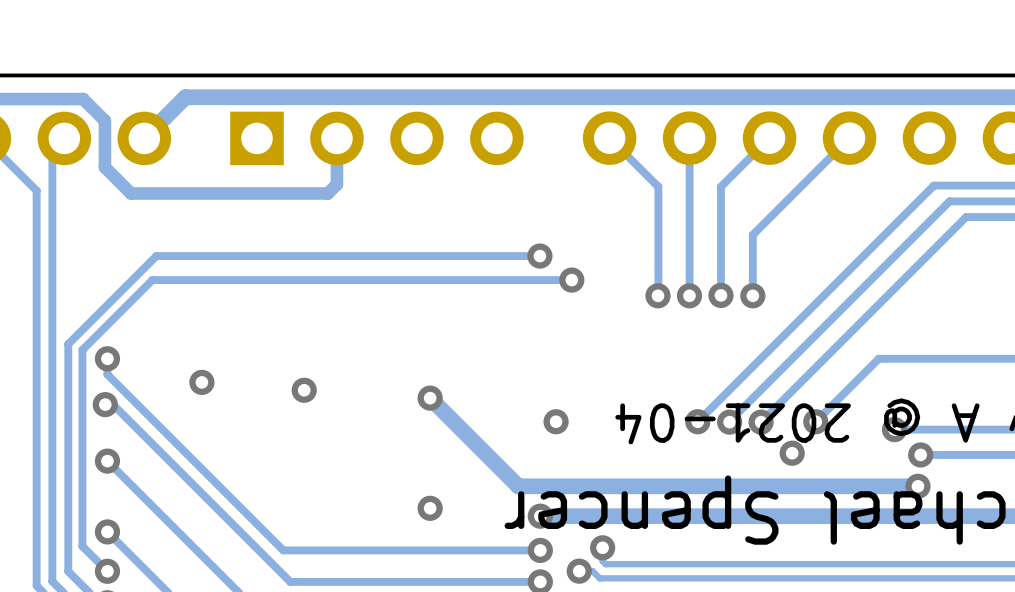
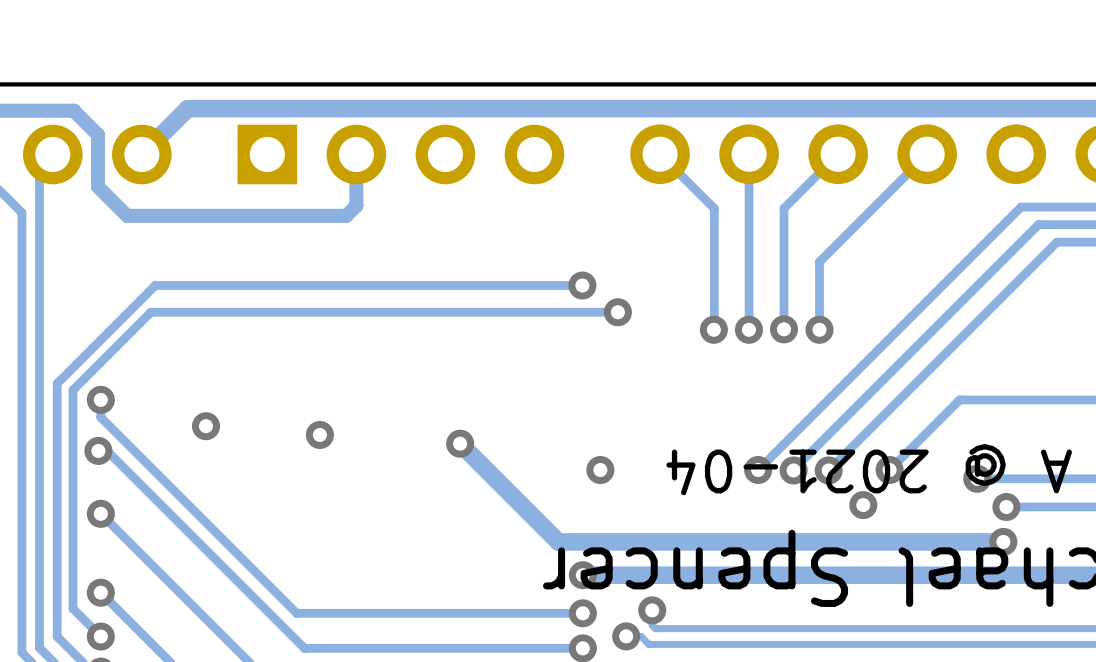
via: (430, 508) -> none

